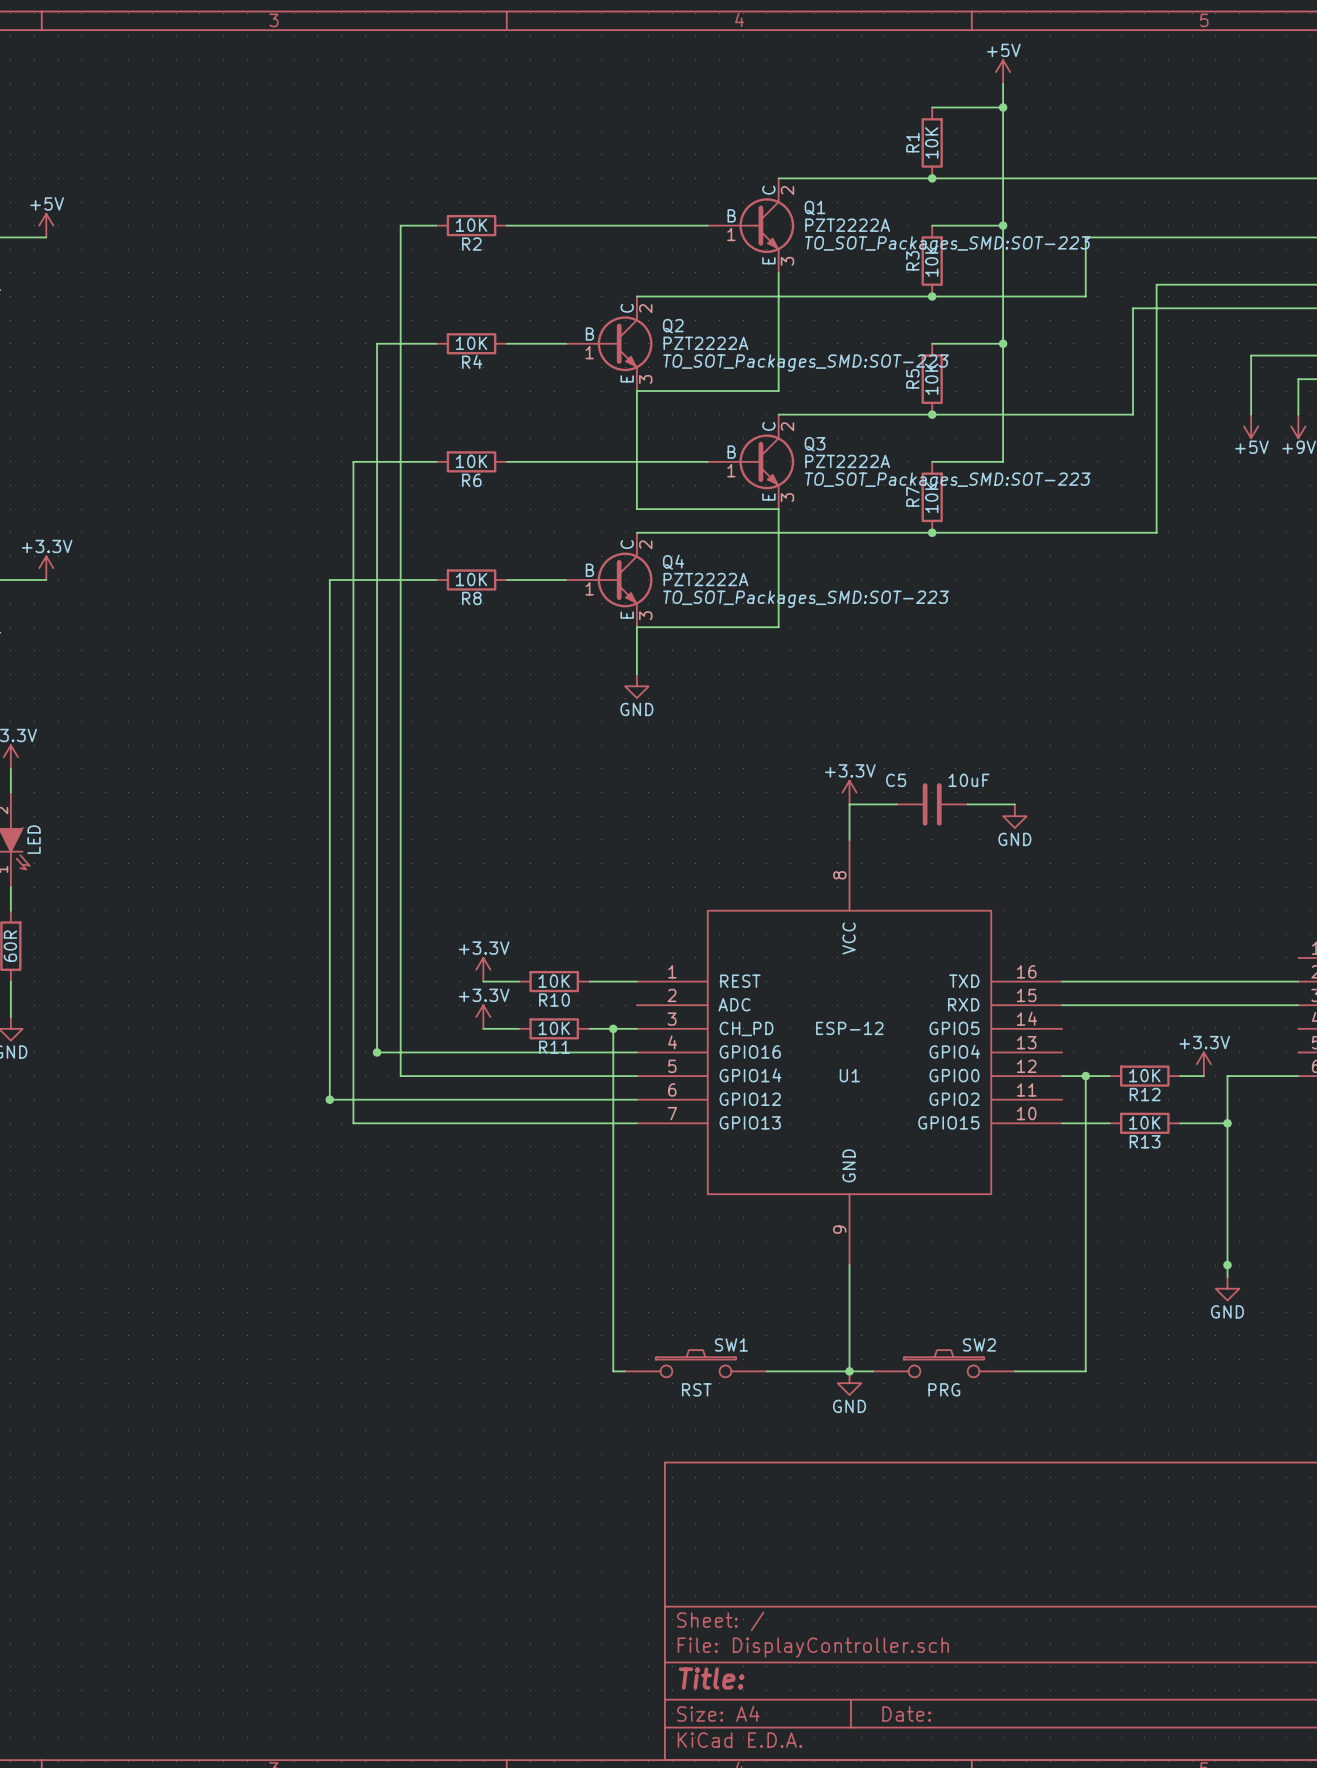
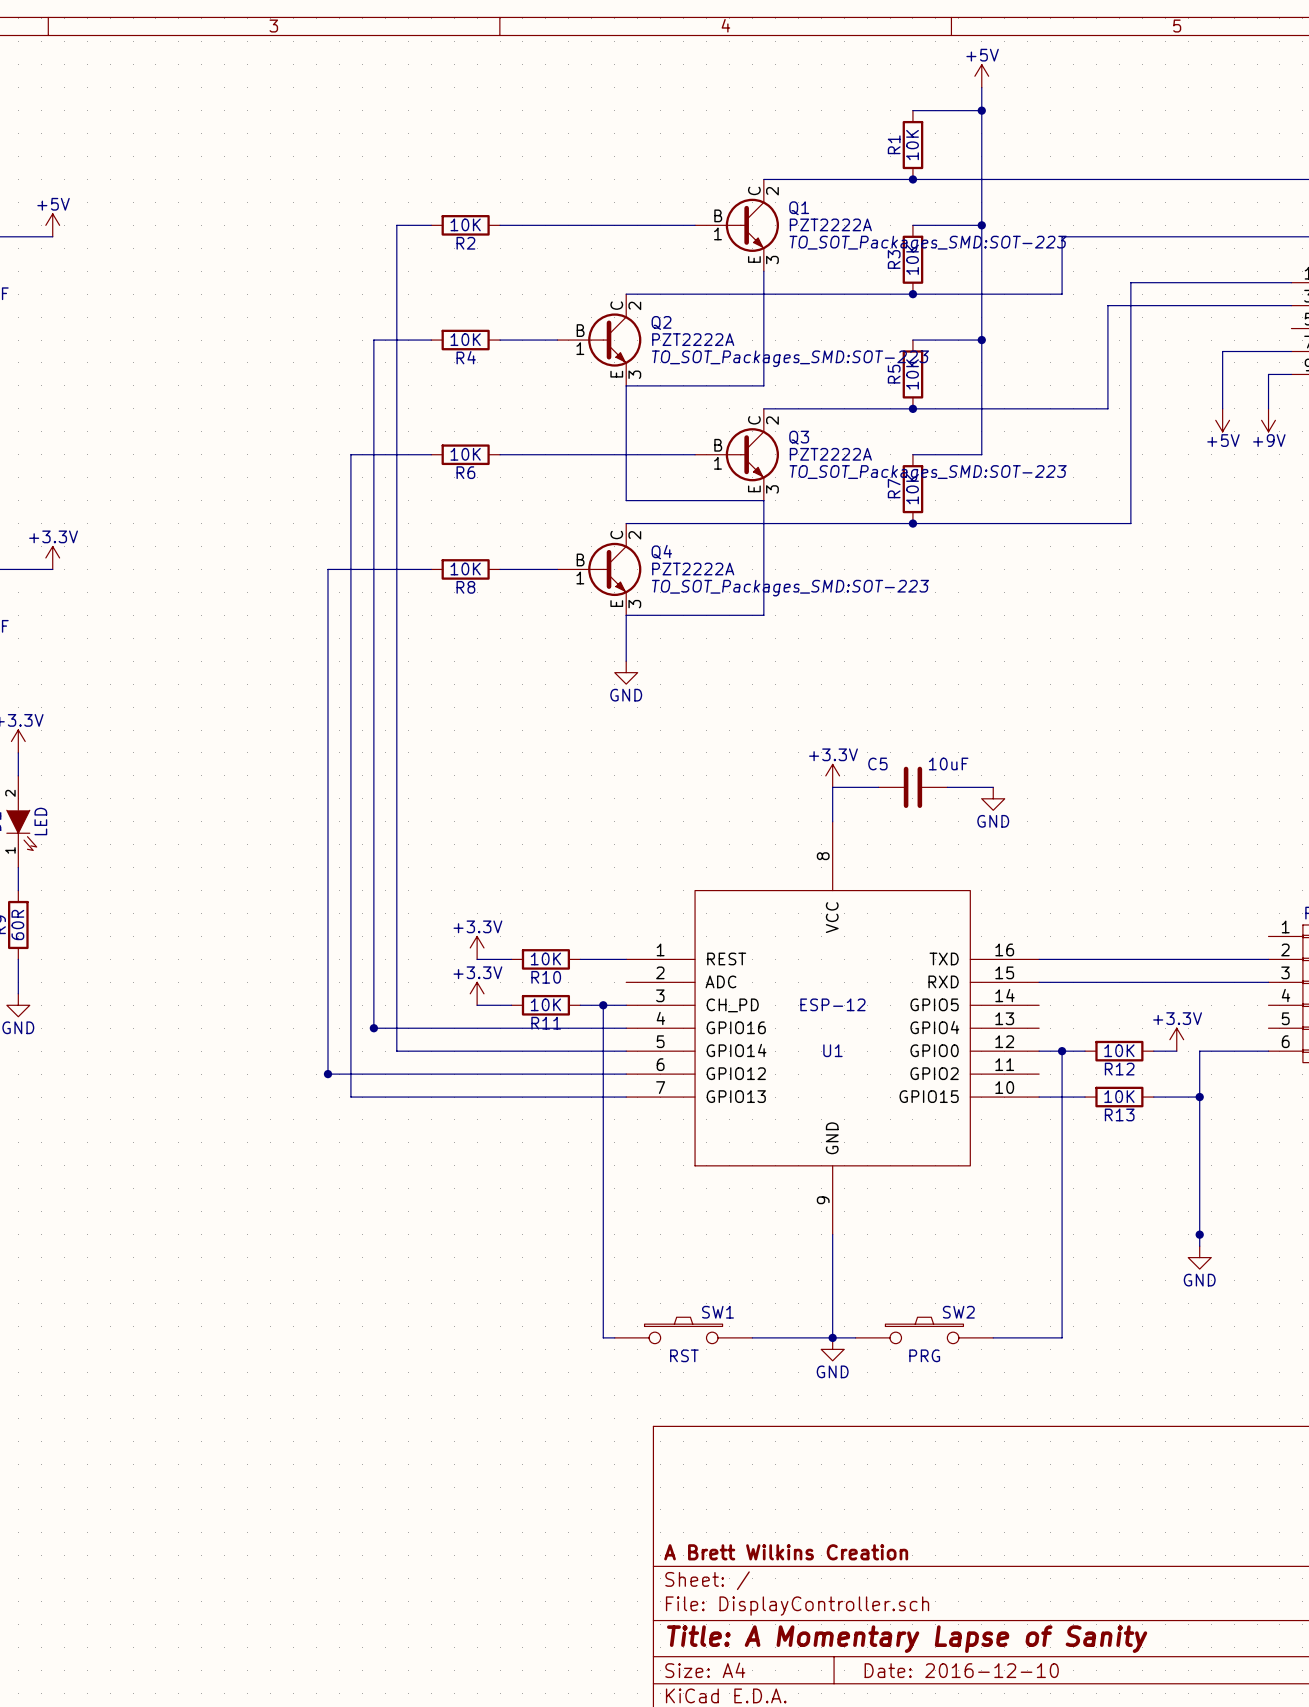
title block: none -> A Brett Wilkins Creation (786, 1552)
title block: Title: (711, 1678) -> Title: A Momentary Lapse of Sanity (907, 1639)
title block: Date: (906, 1714) -> Date: 2016-12-10 (961, 1670)

